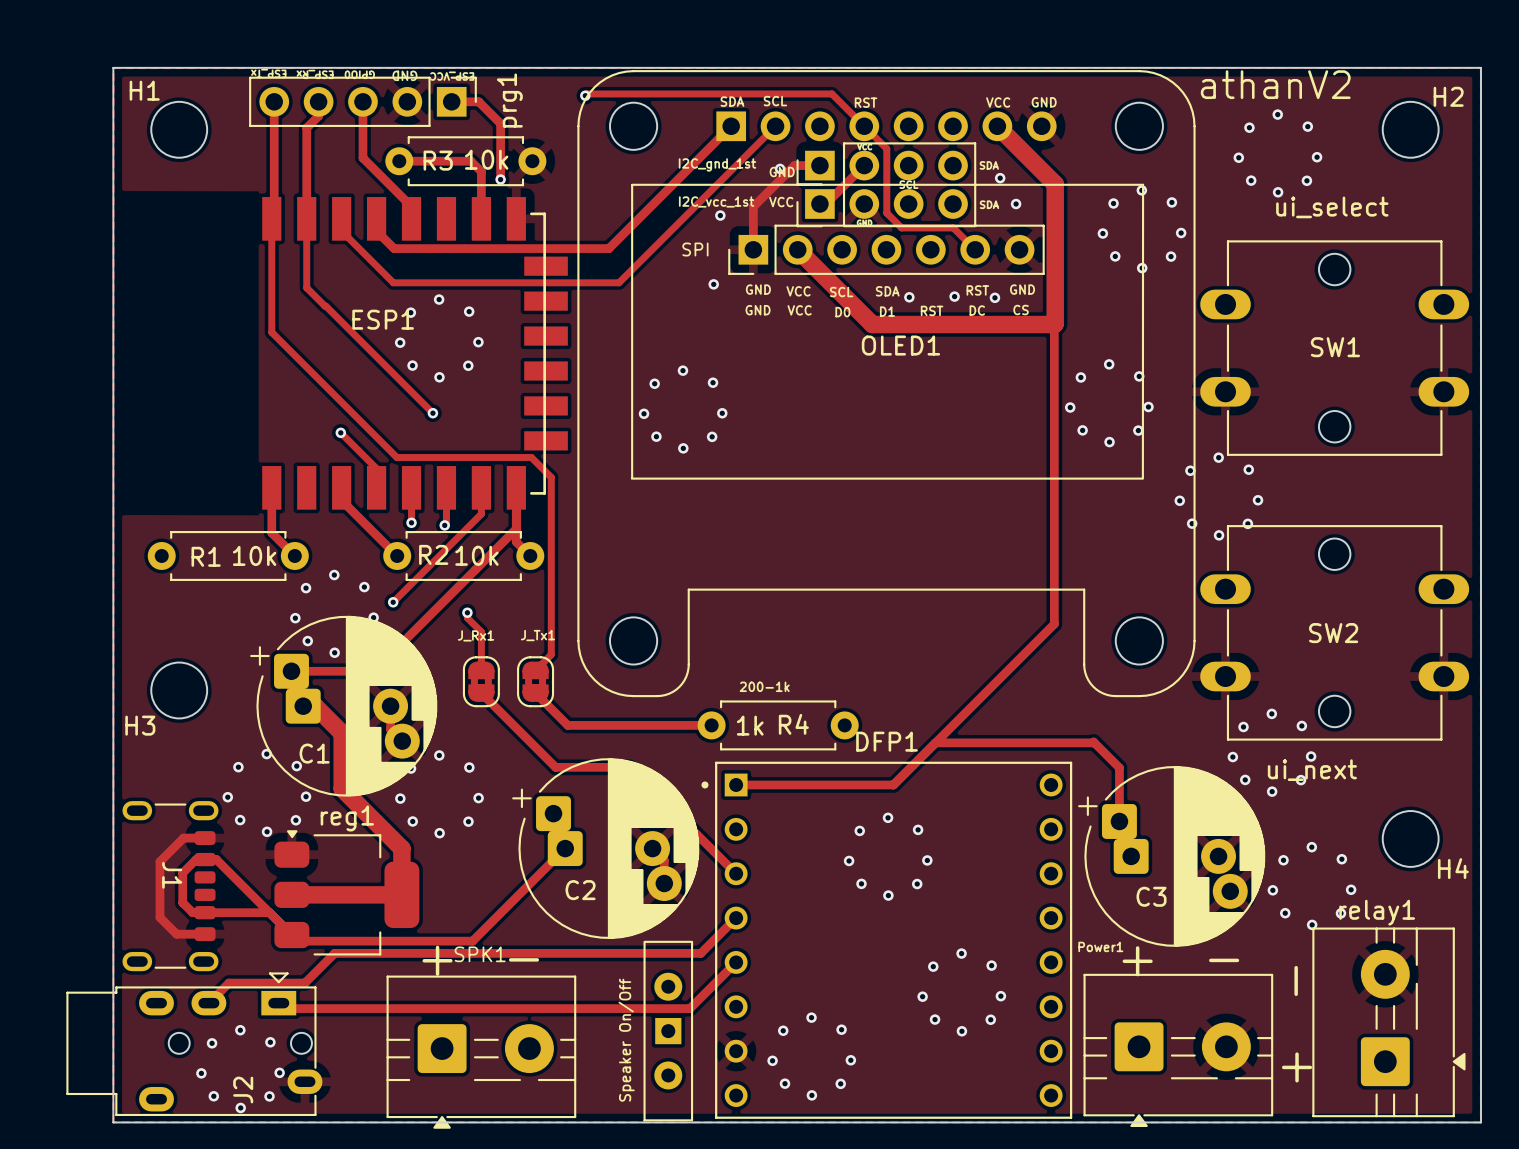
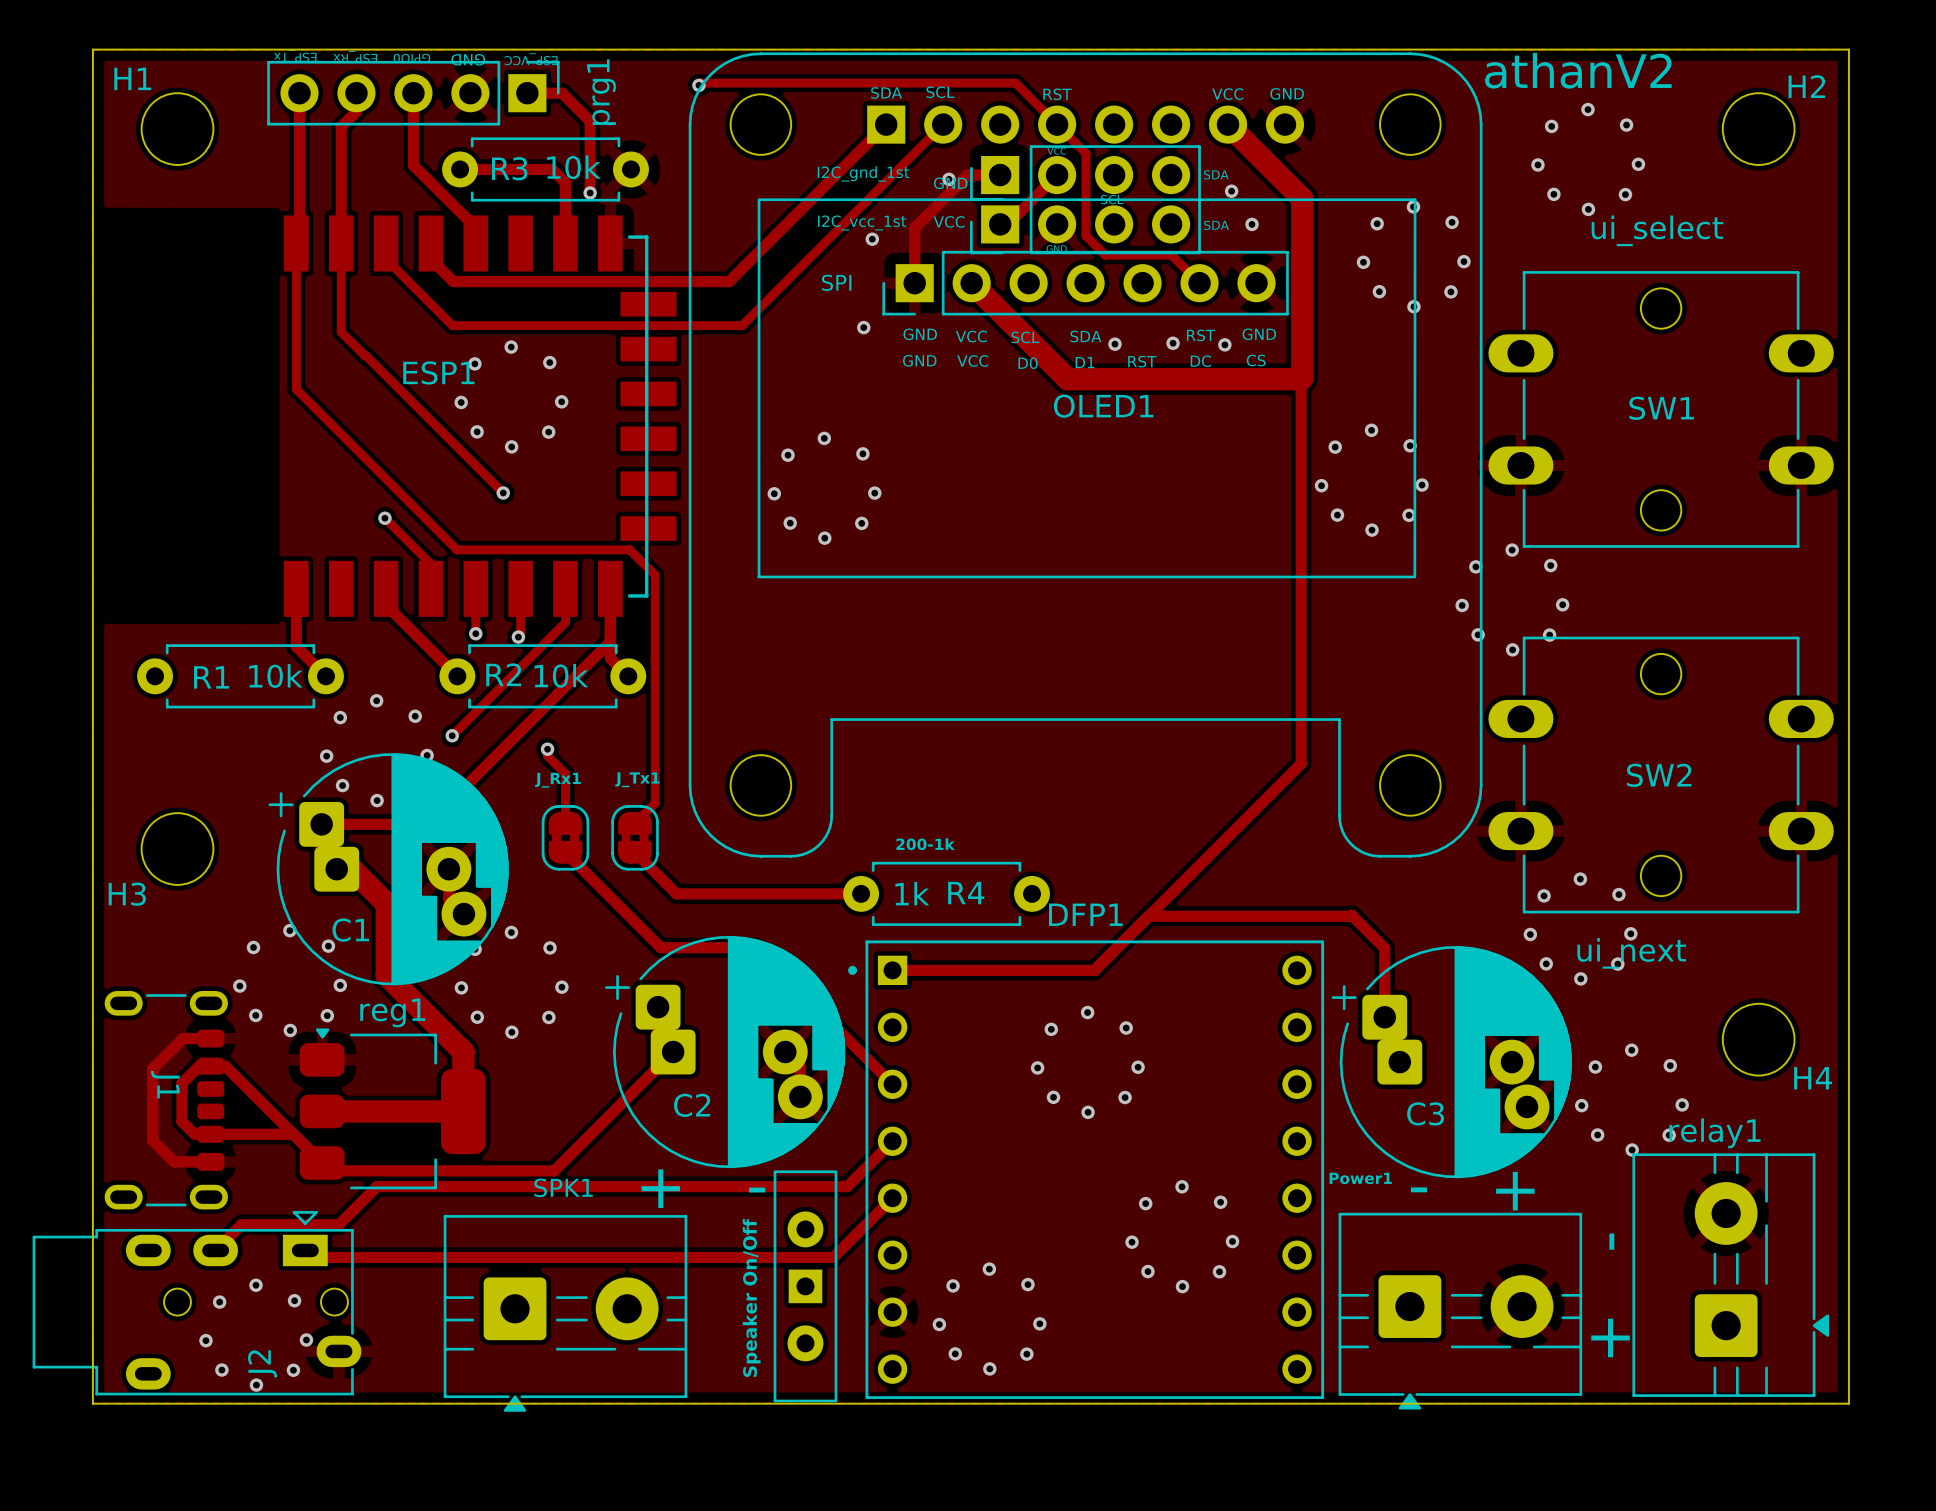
text position: - (524, 959) -> - (757, 1190)
text position: + (437, 960) -> + (660, 1188)
text rotation: 0° (1224, 960) -> 180° (1418, 1189)
text position: - (1224, 960) -> - (1418, 1189)
text rotation: 0° (1137, 961) -> 180° (1515, 1191)

